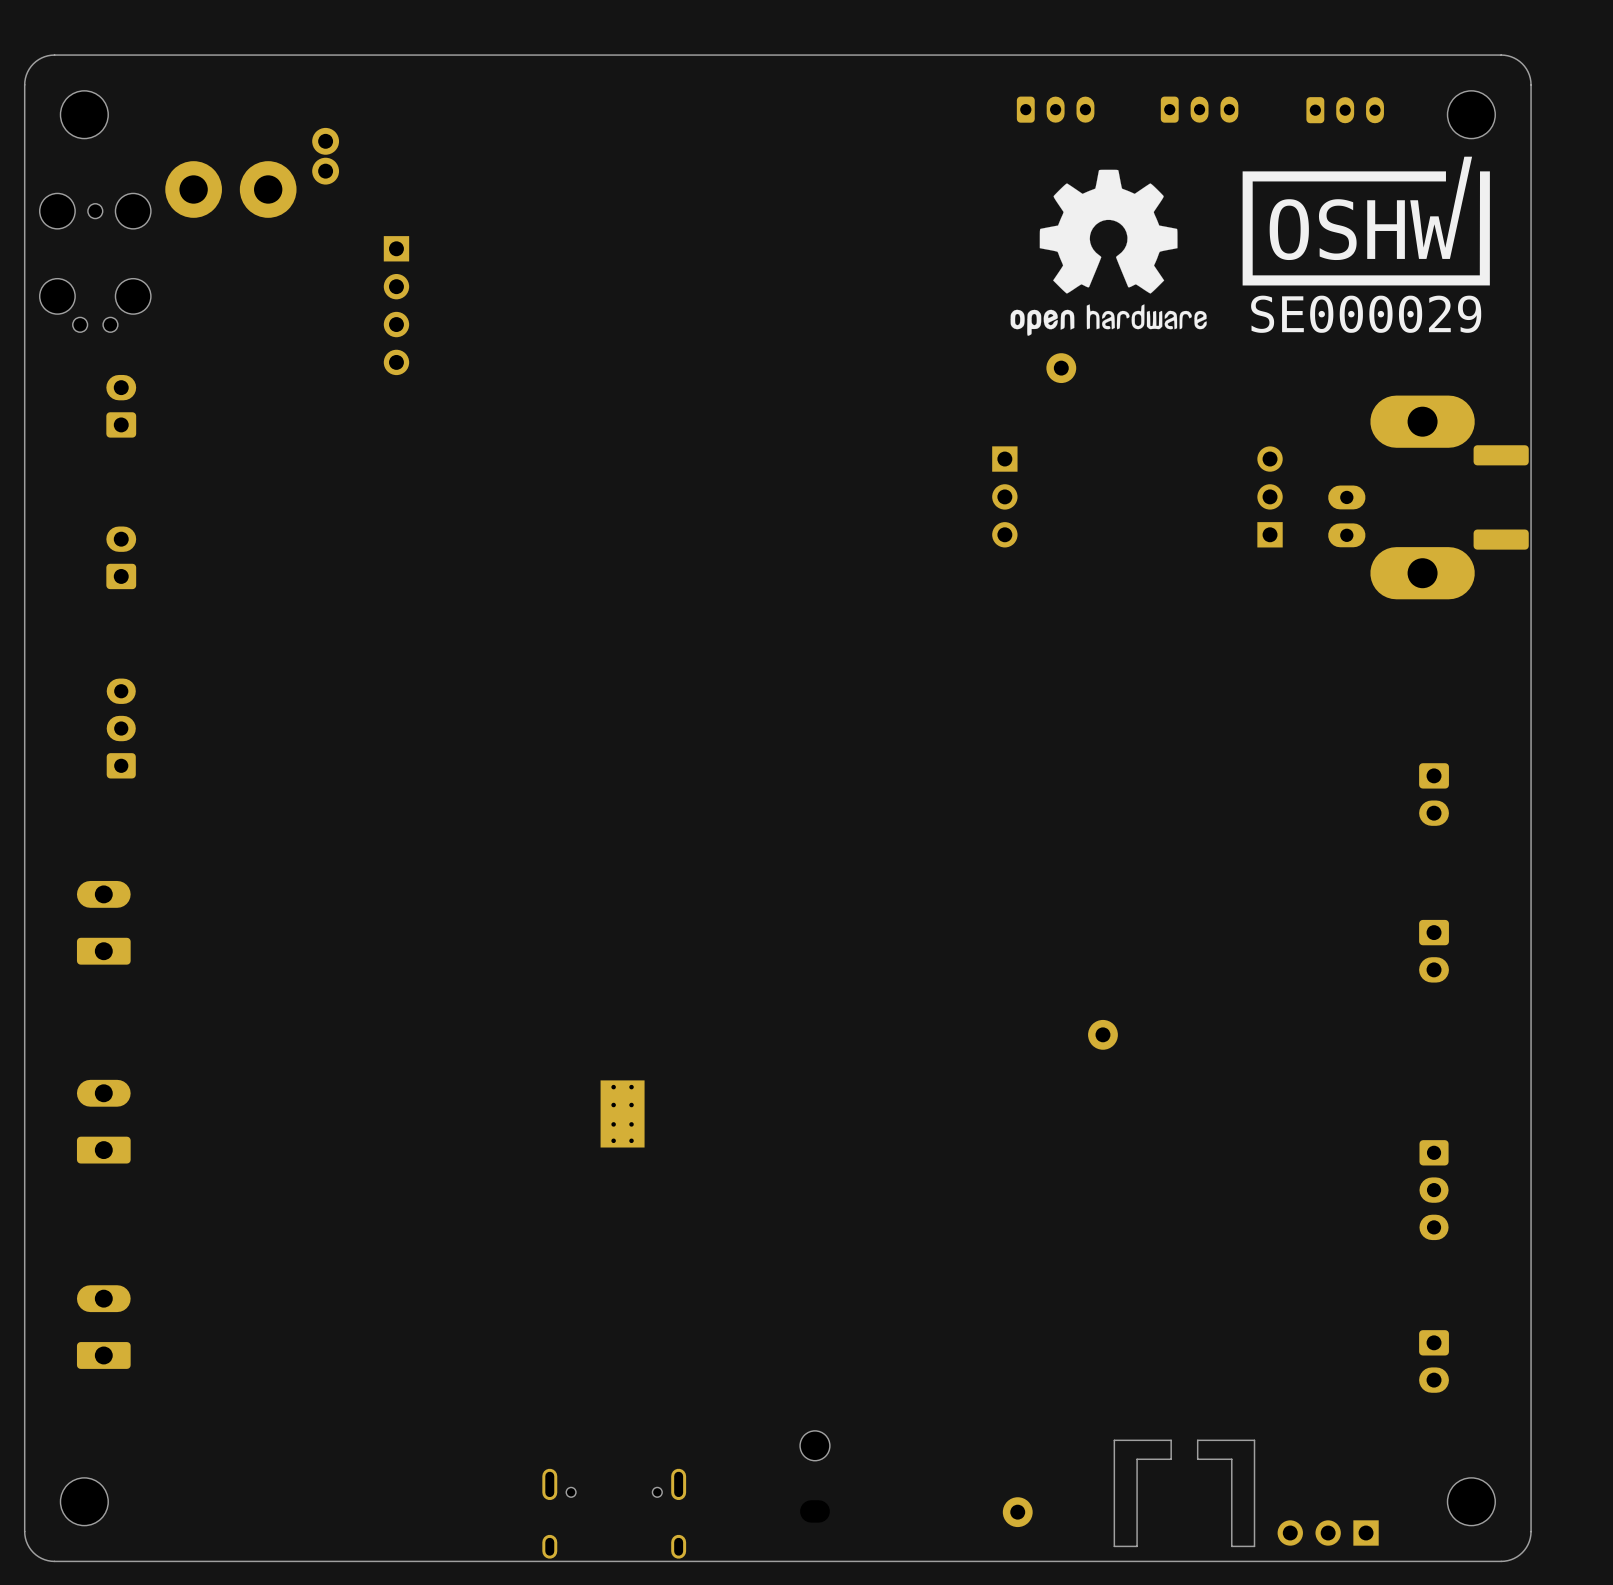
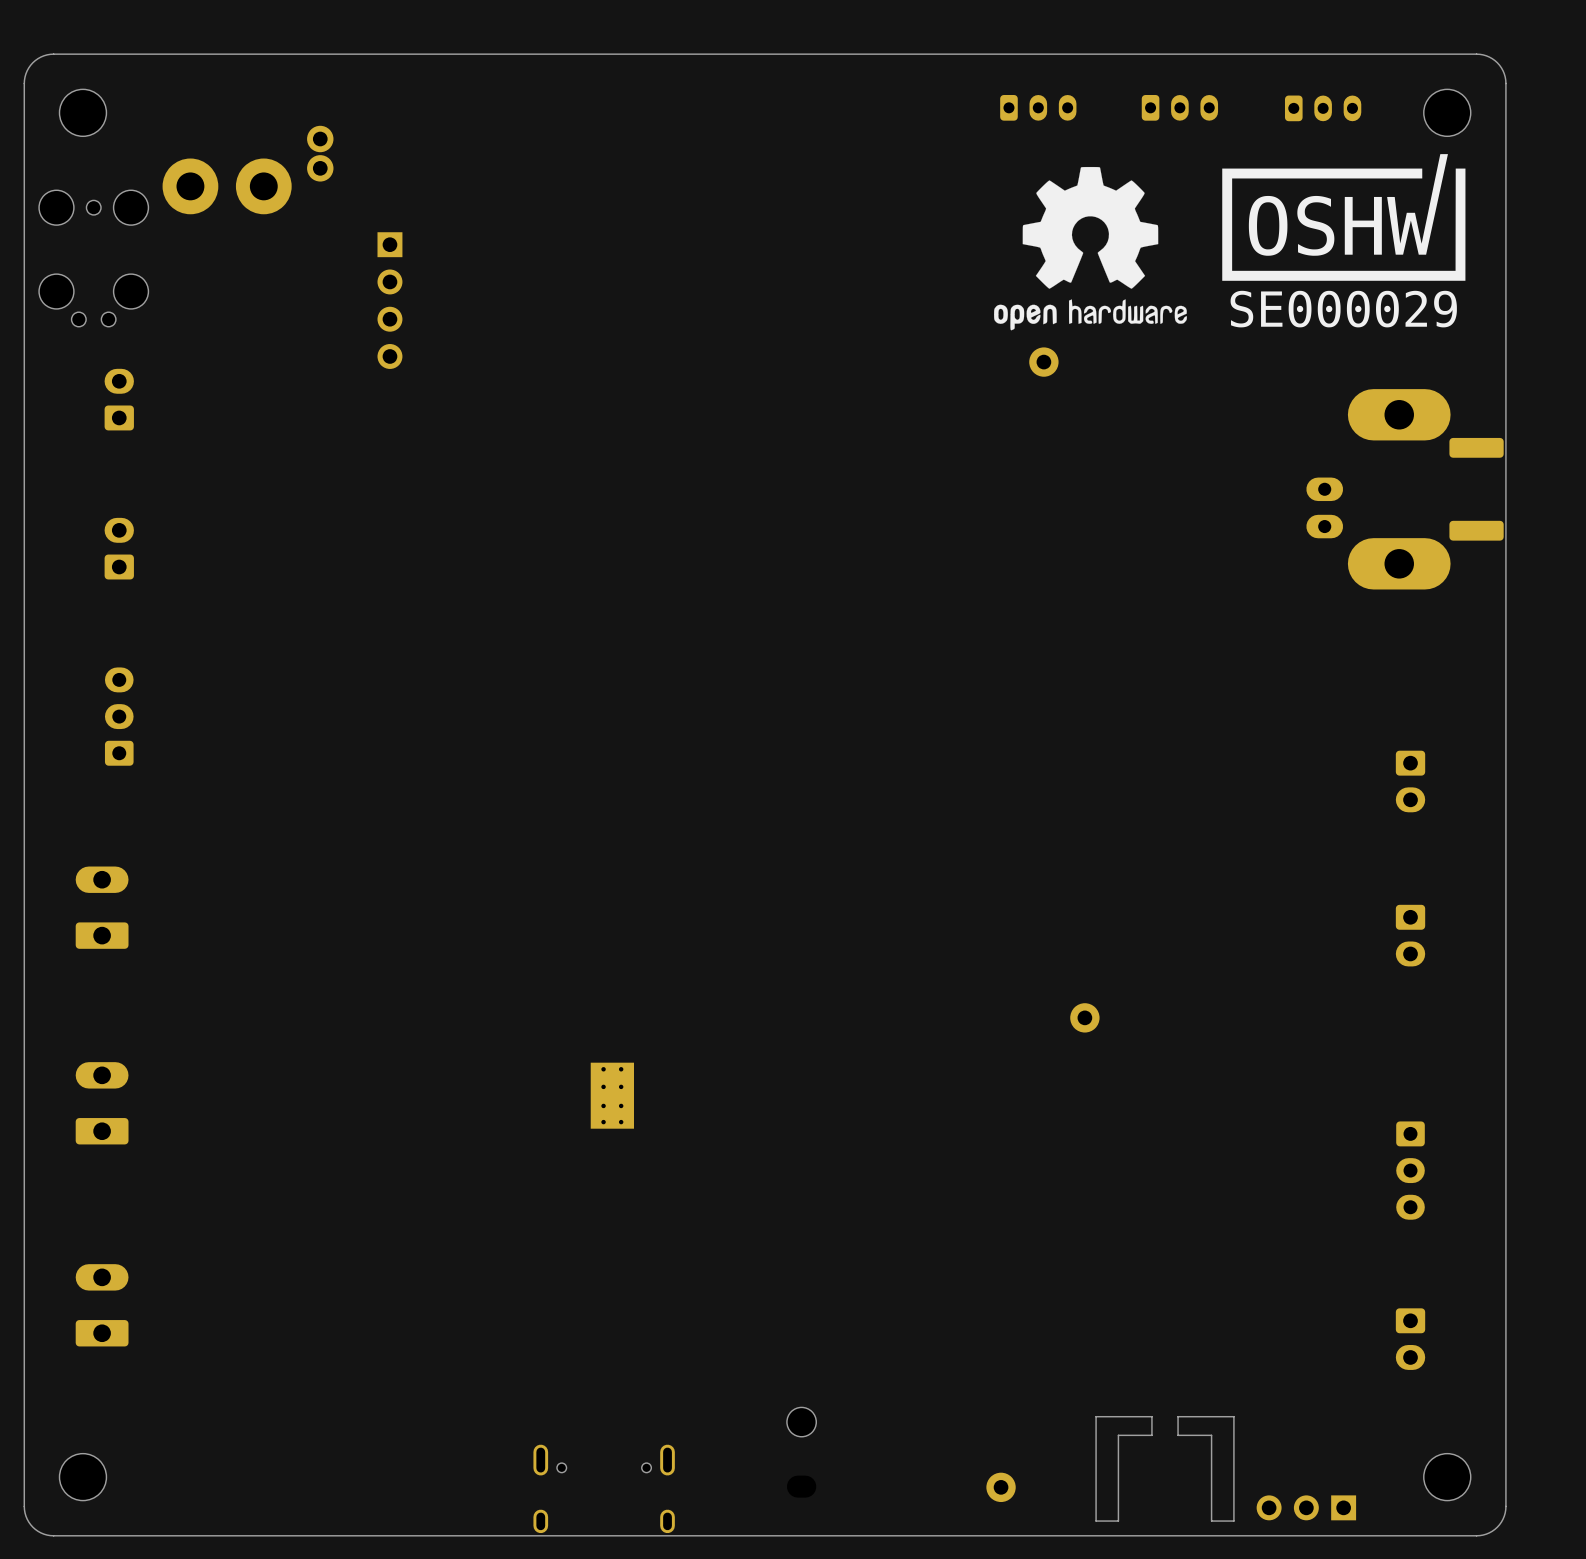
part: (1004, 496) -> none
part: (1270, 496) -> none

